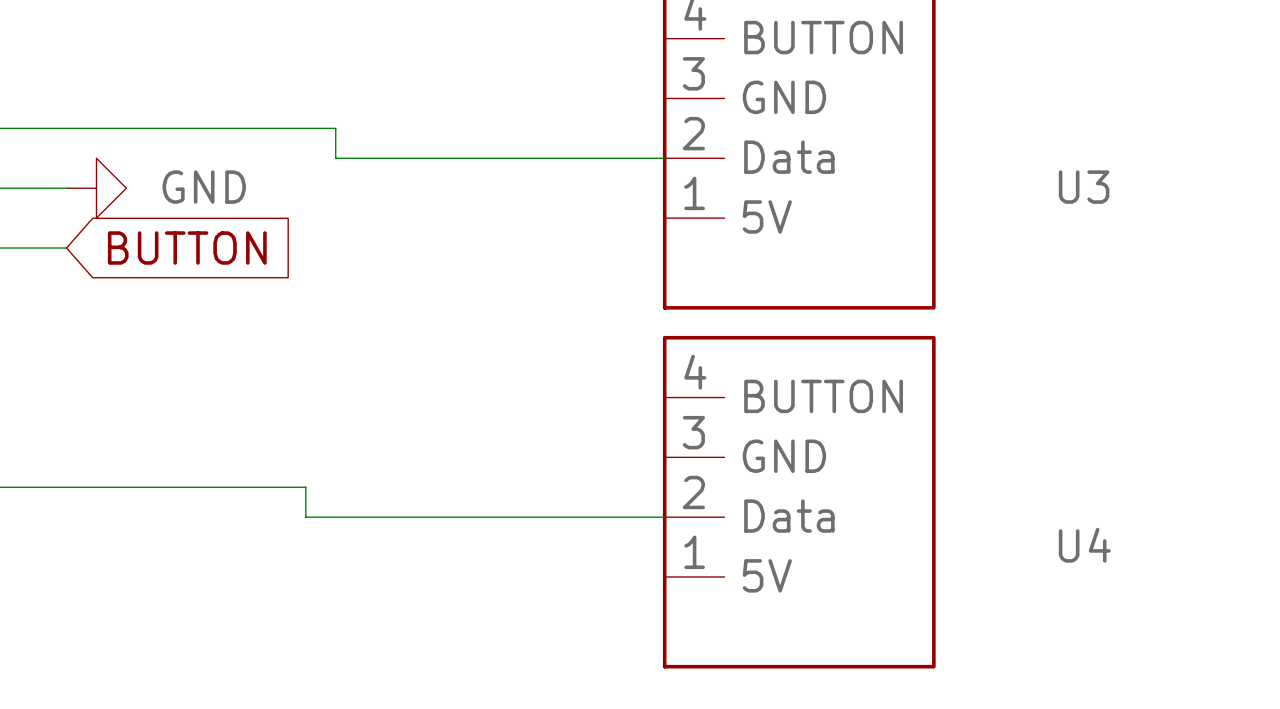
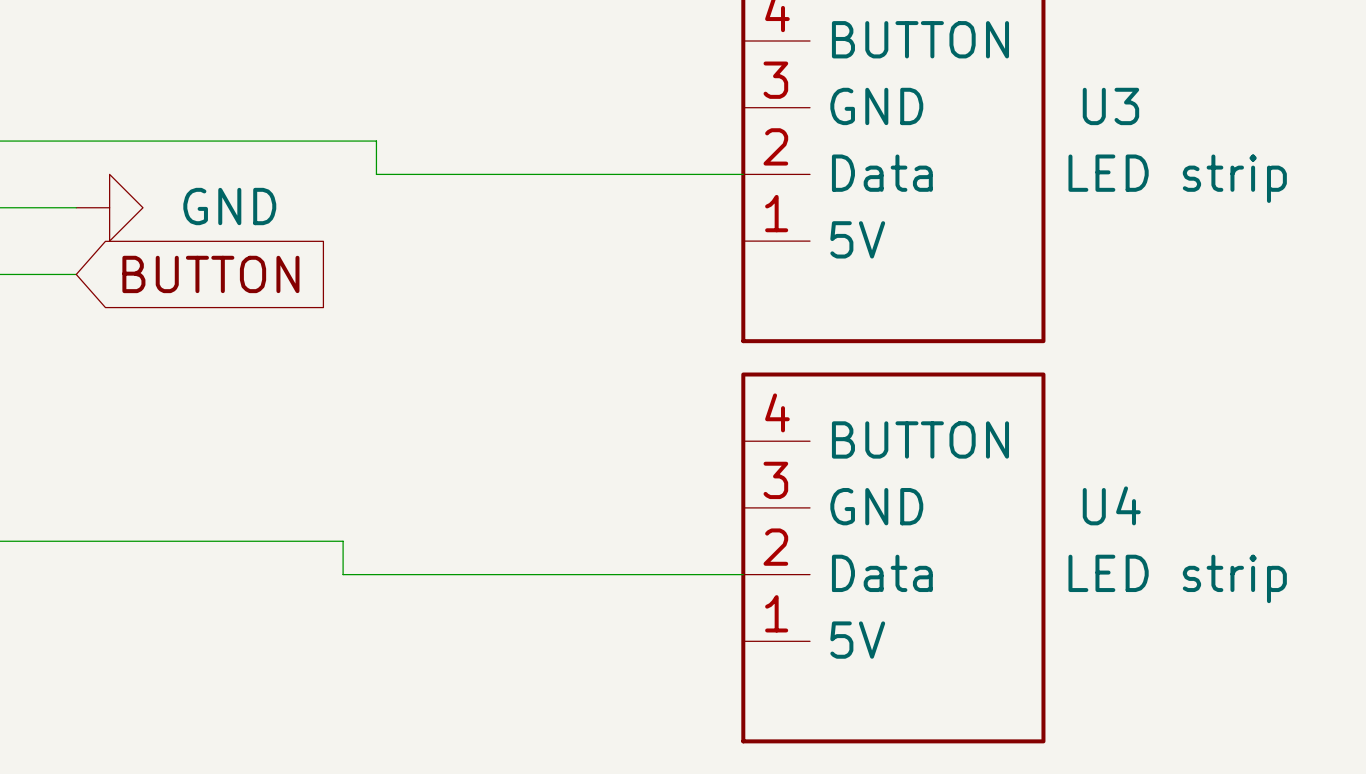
U3 value: none -> LED strip (1177, 178)
U3 name position: U3 (1084, 187) -> U3 (1110, 106)
U4 value: none -> LED strip (1177, 578)
U4 name position: U4 (1084, 545) -> U4 (1111, 505)

